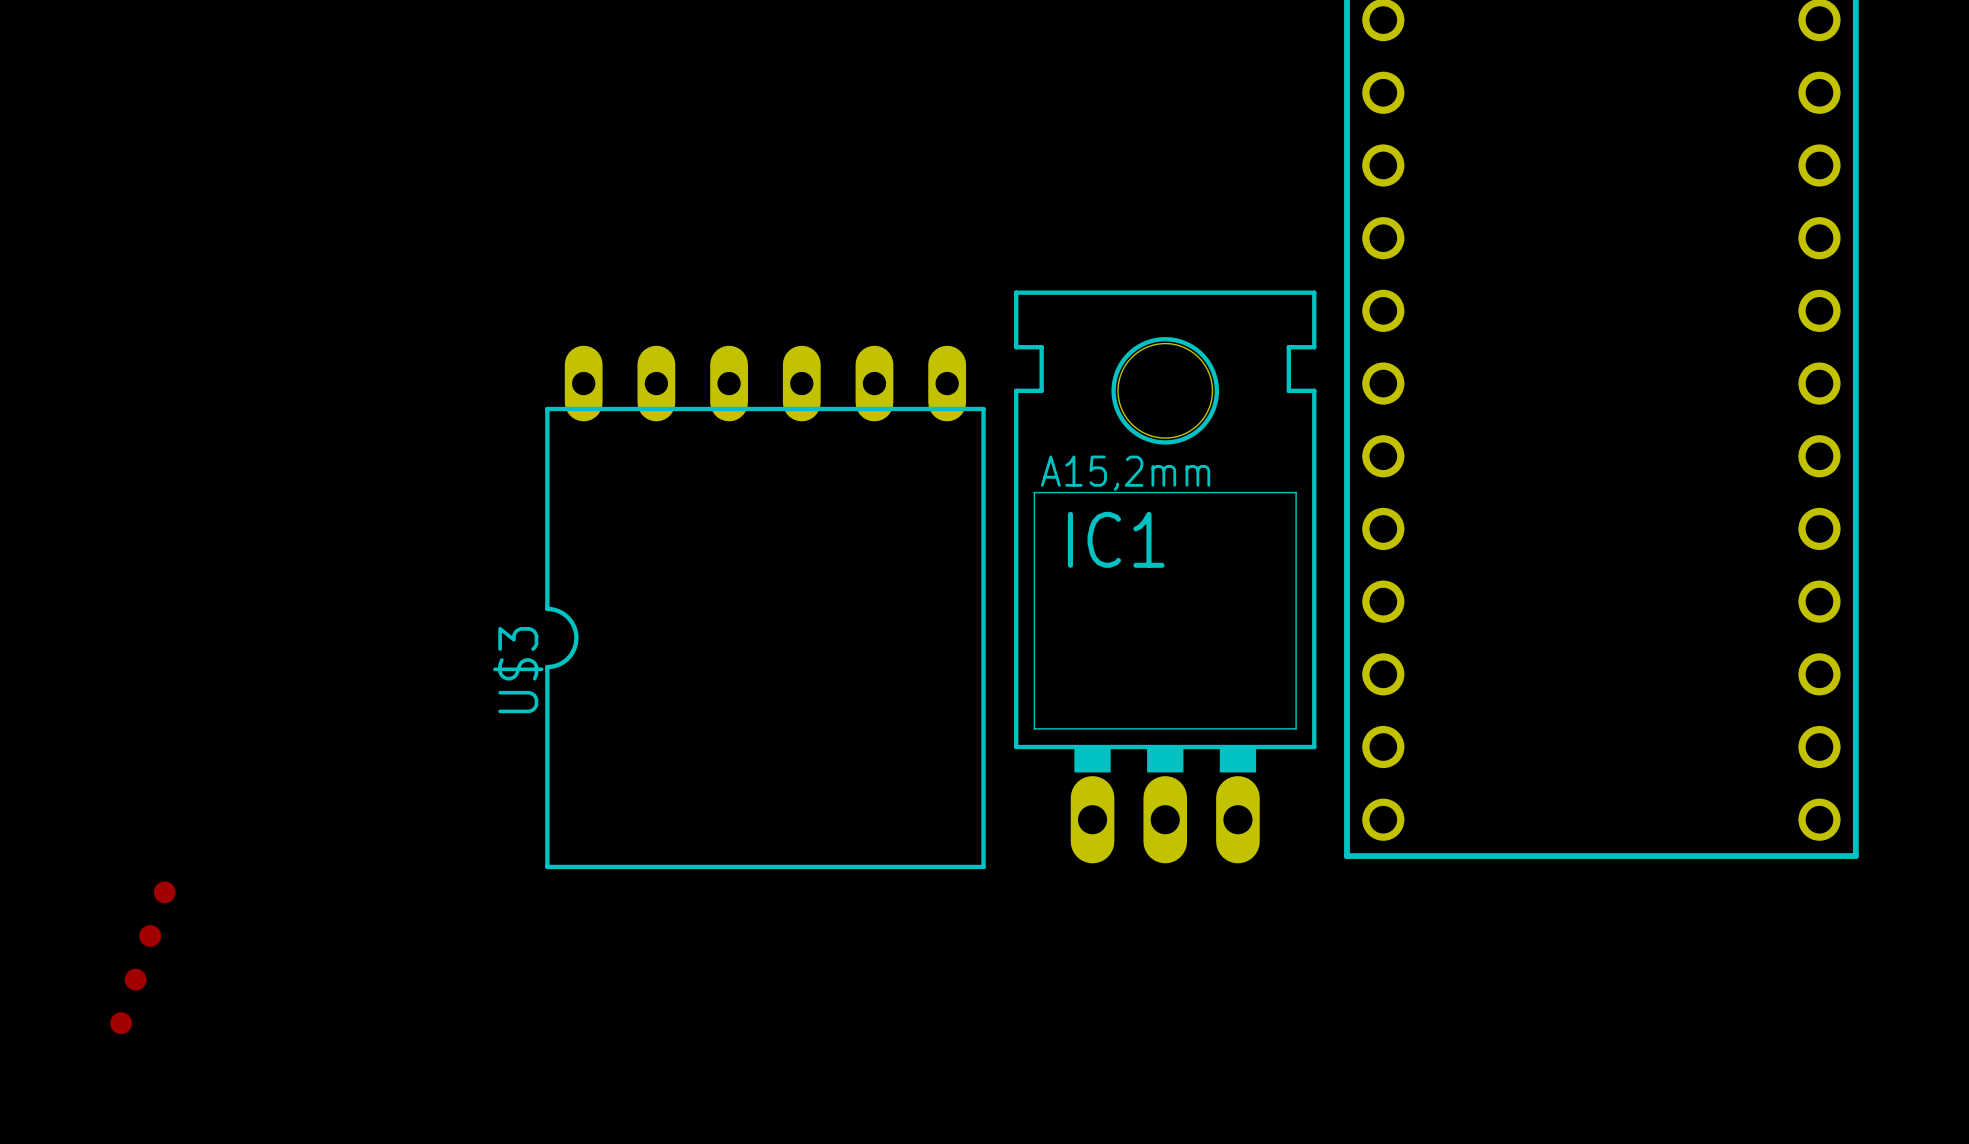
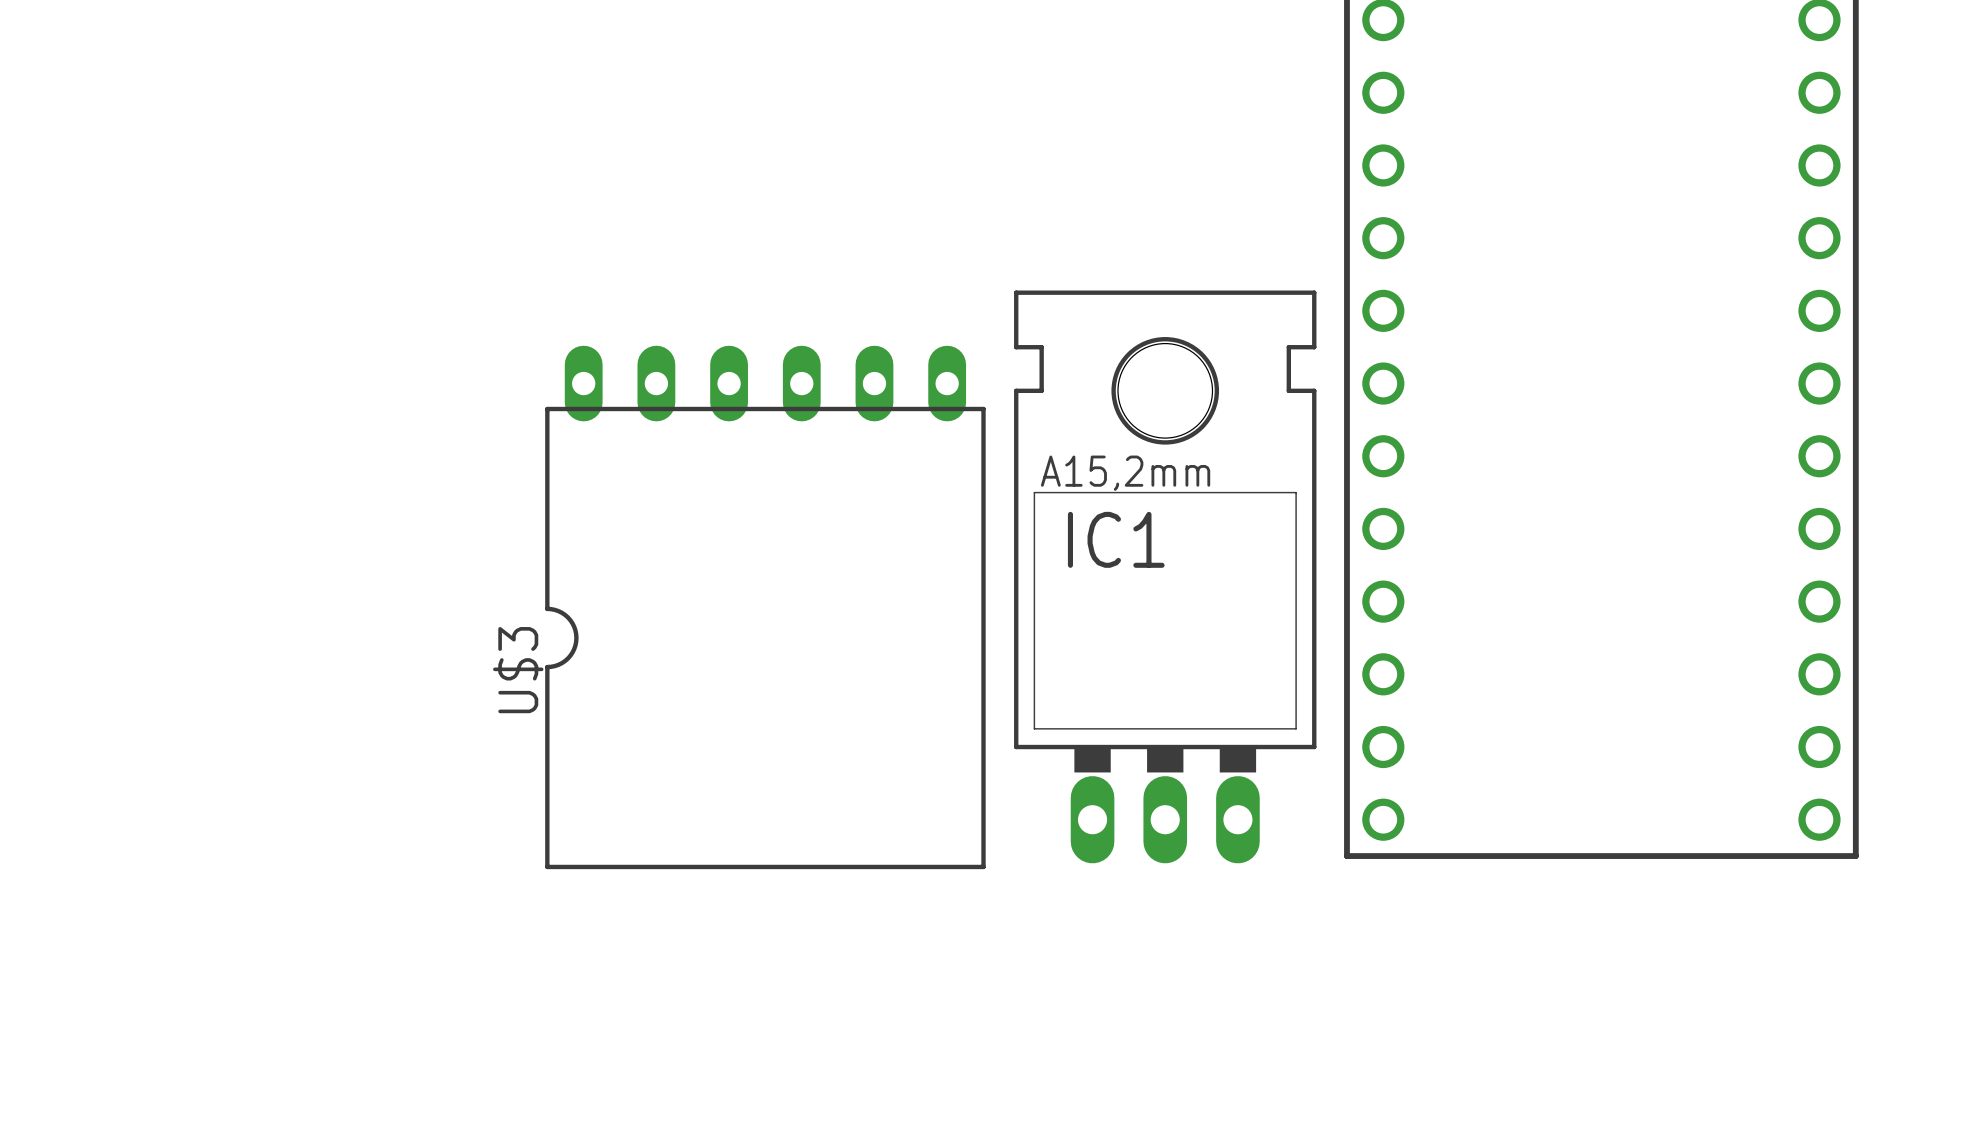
part: (164, 892) -> none
part: (150, 936) -> none
part: (135, 979) -> none
part: (121, 1023) -> none

